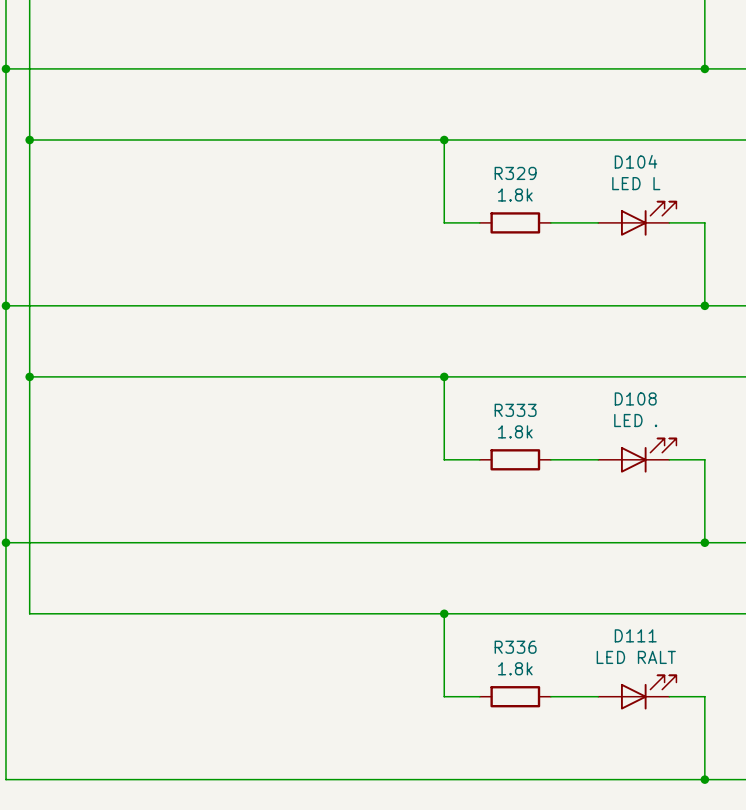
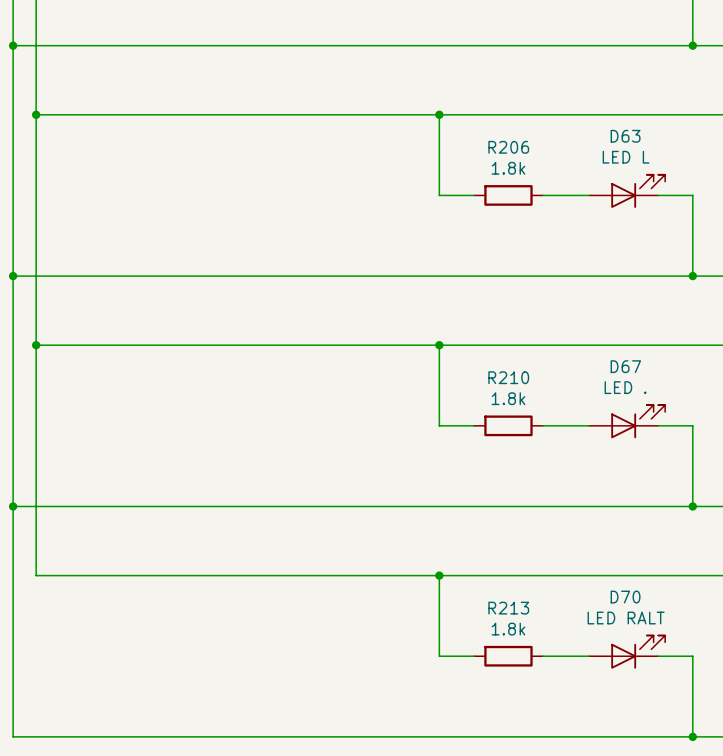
D104 name: D104 (636, 161) -> D63 (625, 136)
R329 name: R329 (515, 173) -> R206 (508, 147)
D108 name: D108 (635, 398) -> D67 (625, 366)
R333 name: R333 (515, 410) -> R210 (508, 377)
D111 name: D111 (635, 635) -> D70 (625, 597)
R336 name: R336 (515, 647) -> R213 (508, 608)

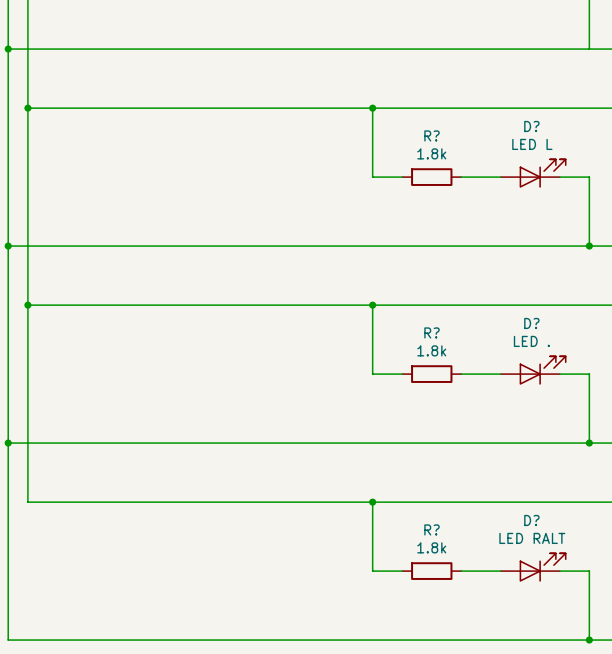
junction: (692, 45) -> none
D63 name: D63 (625, 136) -> D? (531, 126)
R206 name: R206 (508, 147) -> R? (431, 135)
D67 name: D67 (625, 366) -> D? (531, 323)
R210 name: R210 (508, 377) -> R? (431, 332)
D70 name: D70 (625, 597) -> D? (531, 520)
R213 name: R213 (508, 608) -> R? (431, 529)

